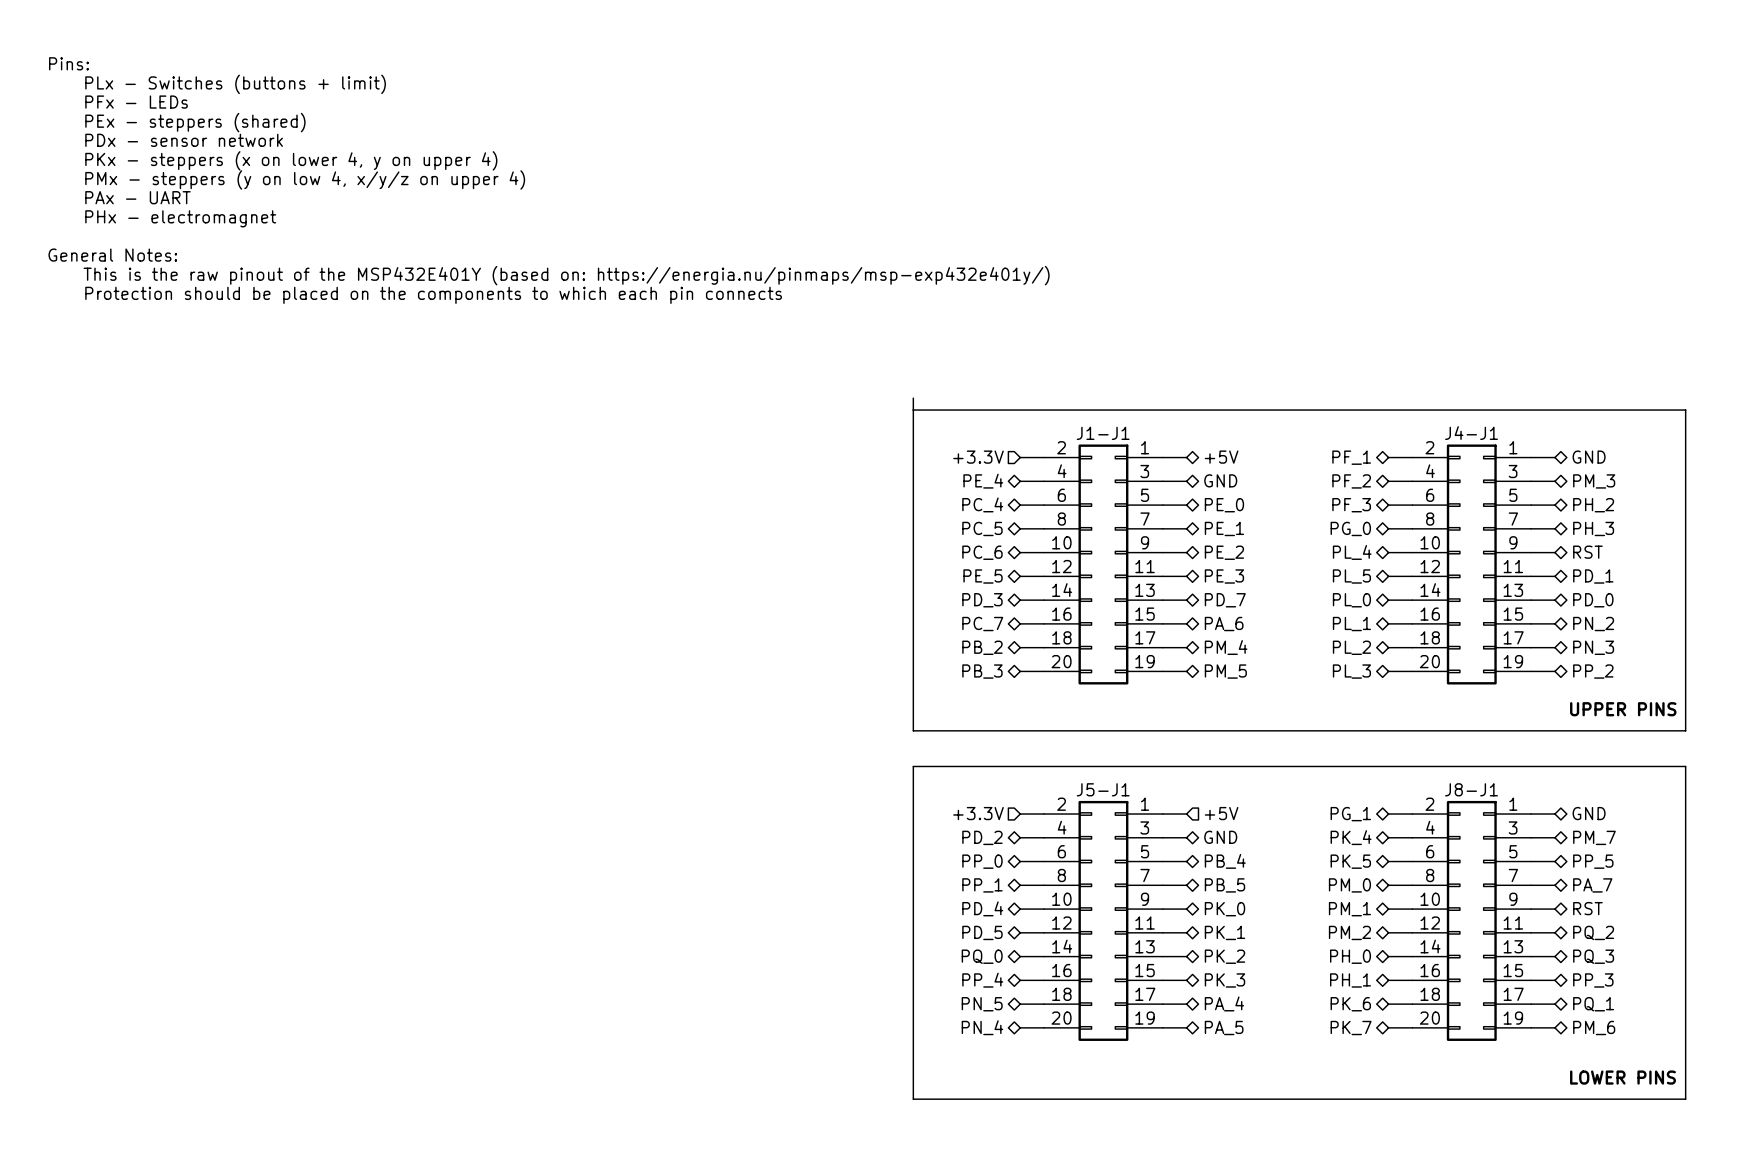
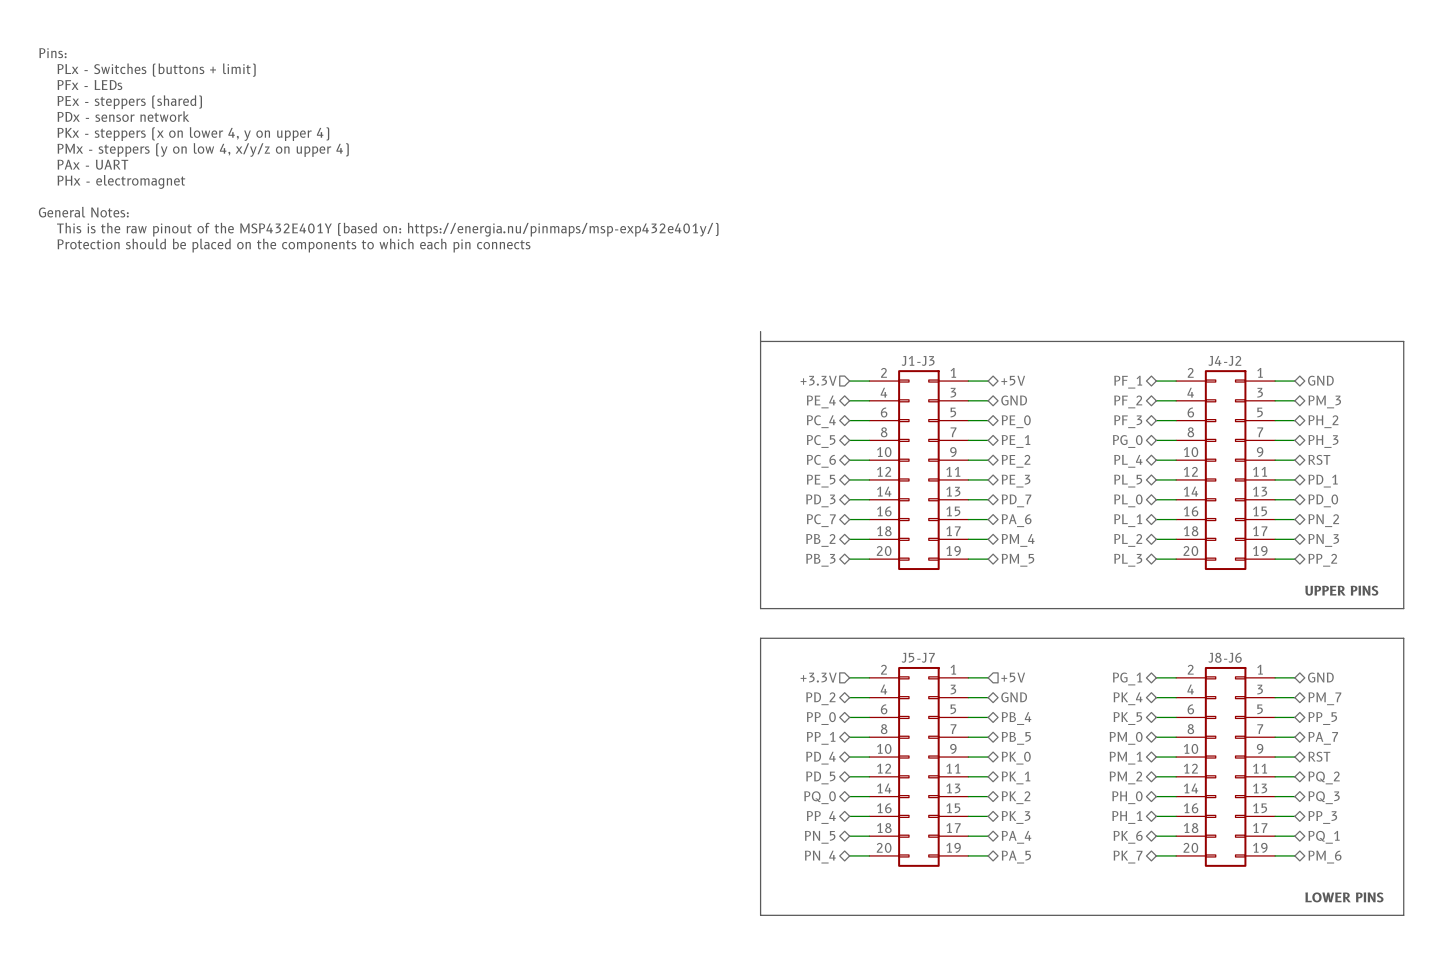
J1-J1 name: J1-J1 (1103, 433) -> J1-J3 (918, 360)
J4-J1 name: J4-J1 (1471, 433) -> J4-J2 (1224, 360)
J5-J1 name: J5-J1 (1103, 789) -> J5-J7 (918, 657)
J8-J1 name: J8-J1 (1471, 789) -> J8-J6 (1225, 657)

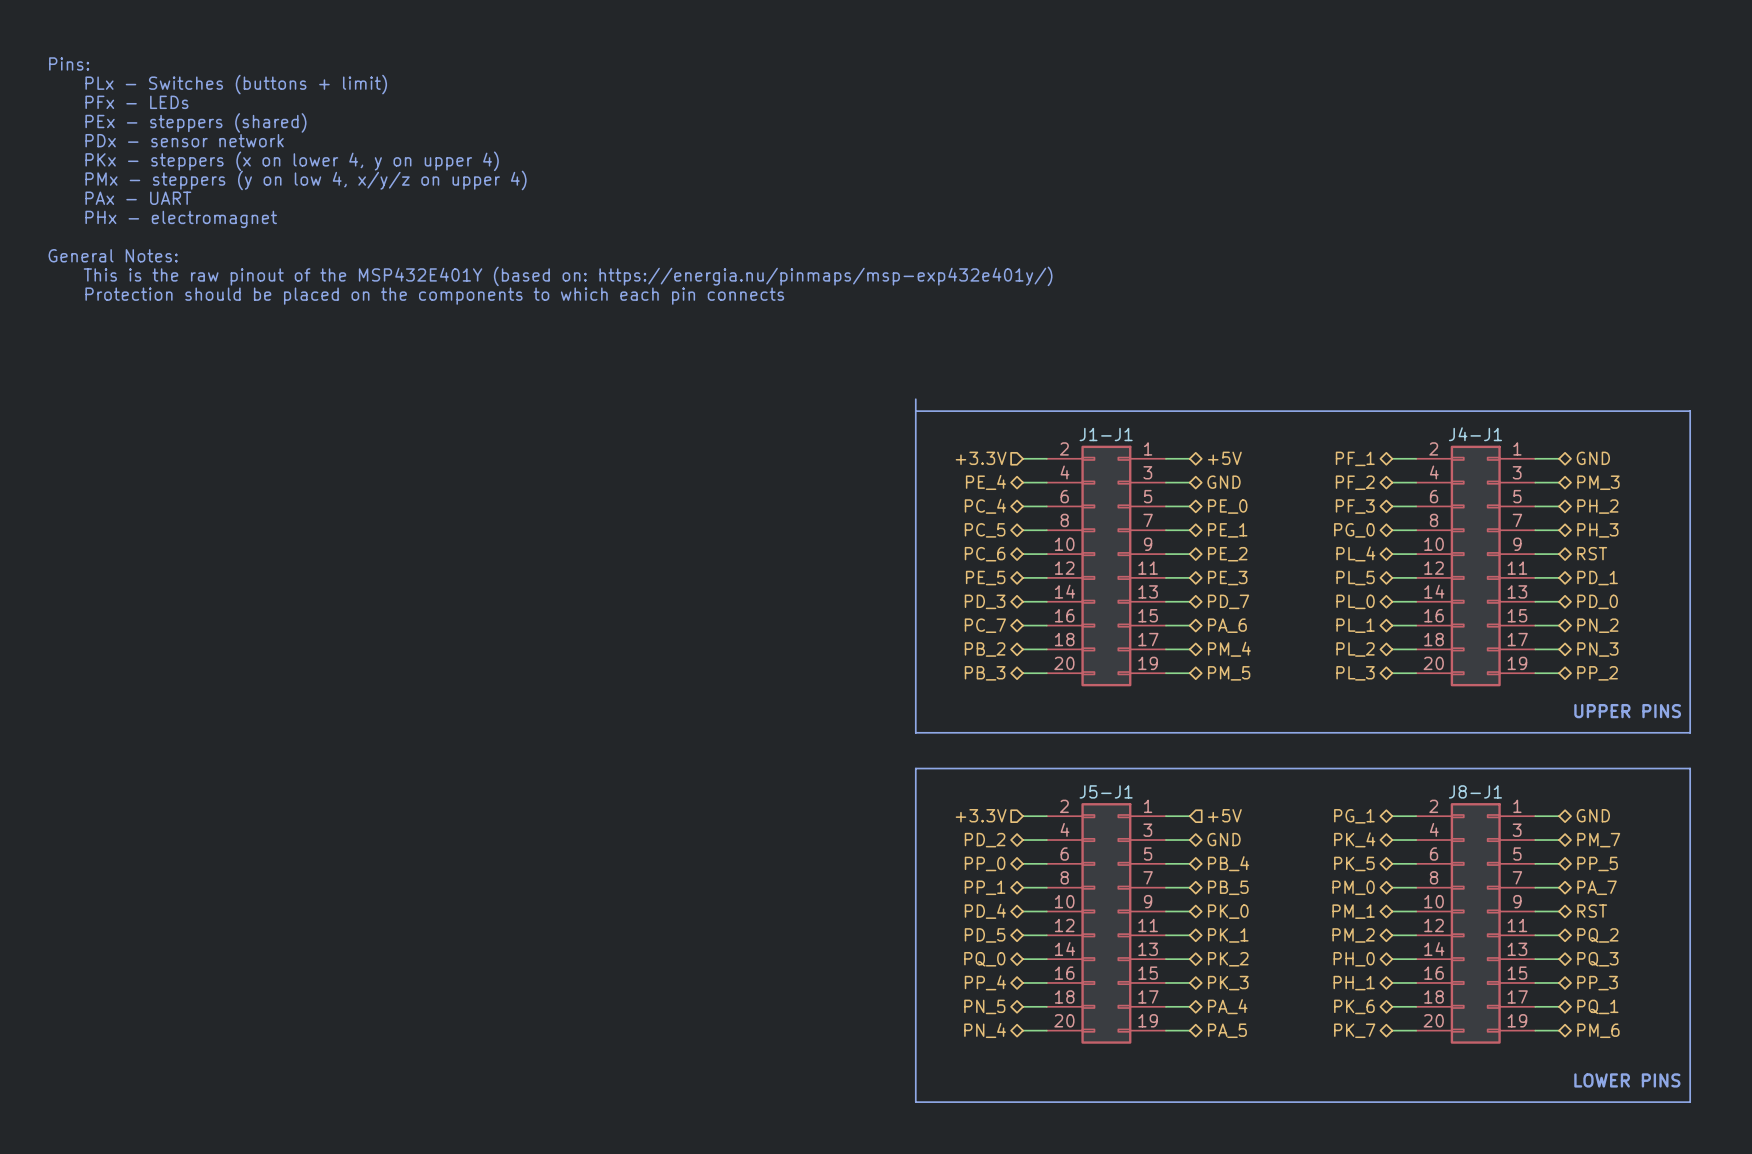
J1-J3 name: J1-J3 (918, 360) -> J1-J1 (1106, 434)
J4-J2 name: J4-J2 (1224, 360) -> J4-J1 (1475, 434)
J5-J7 name: J5-J7 (918, 657) -> J5-J1 (1106, 791)
J8-J6 name: J8-J6 (1225, 657) -> J8-J1 (1475, 791)

